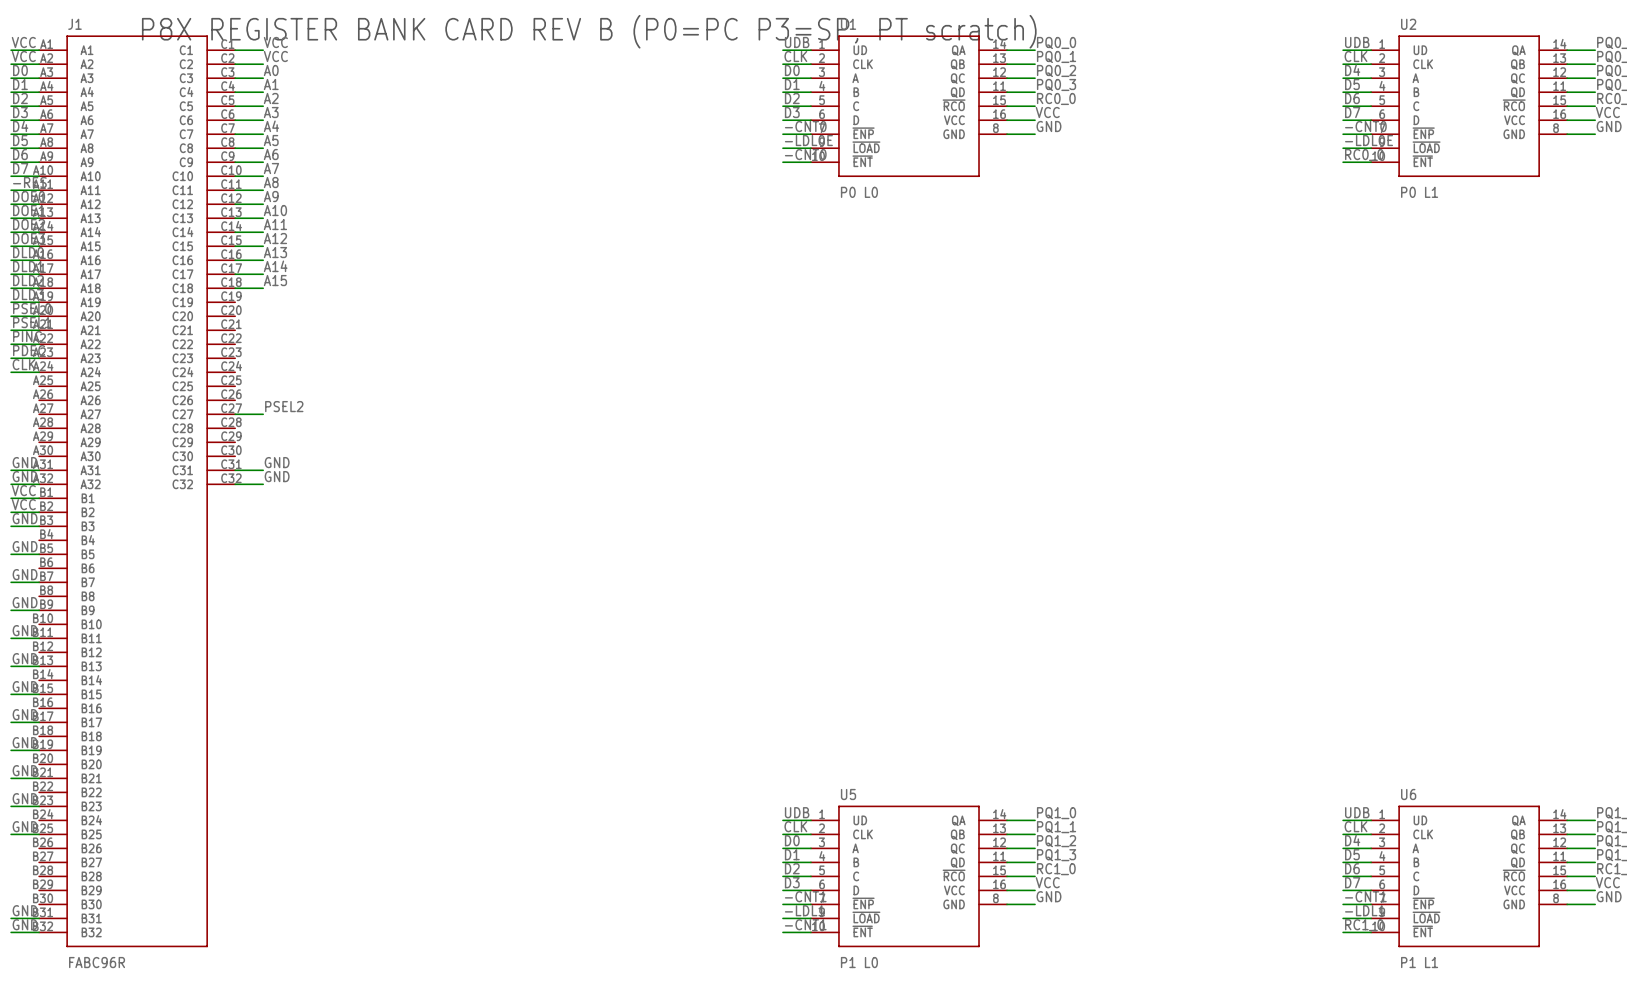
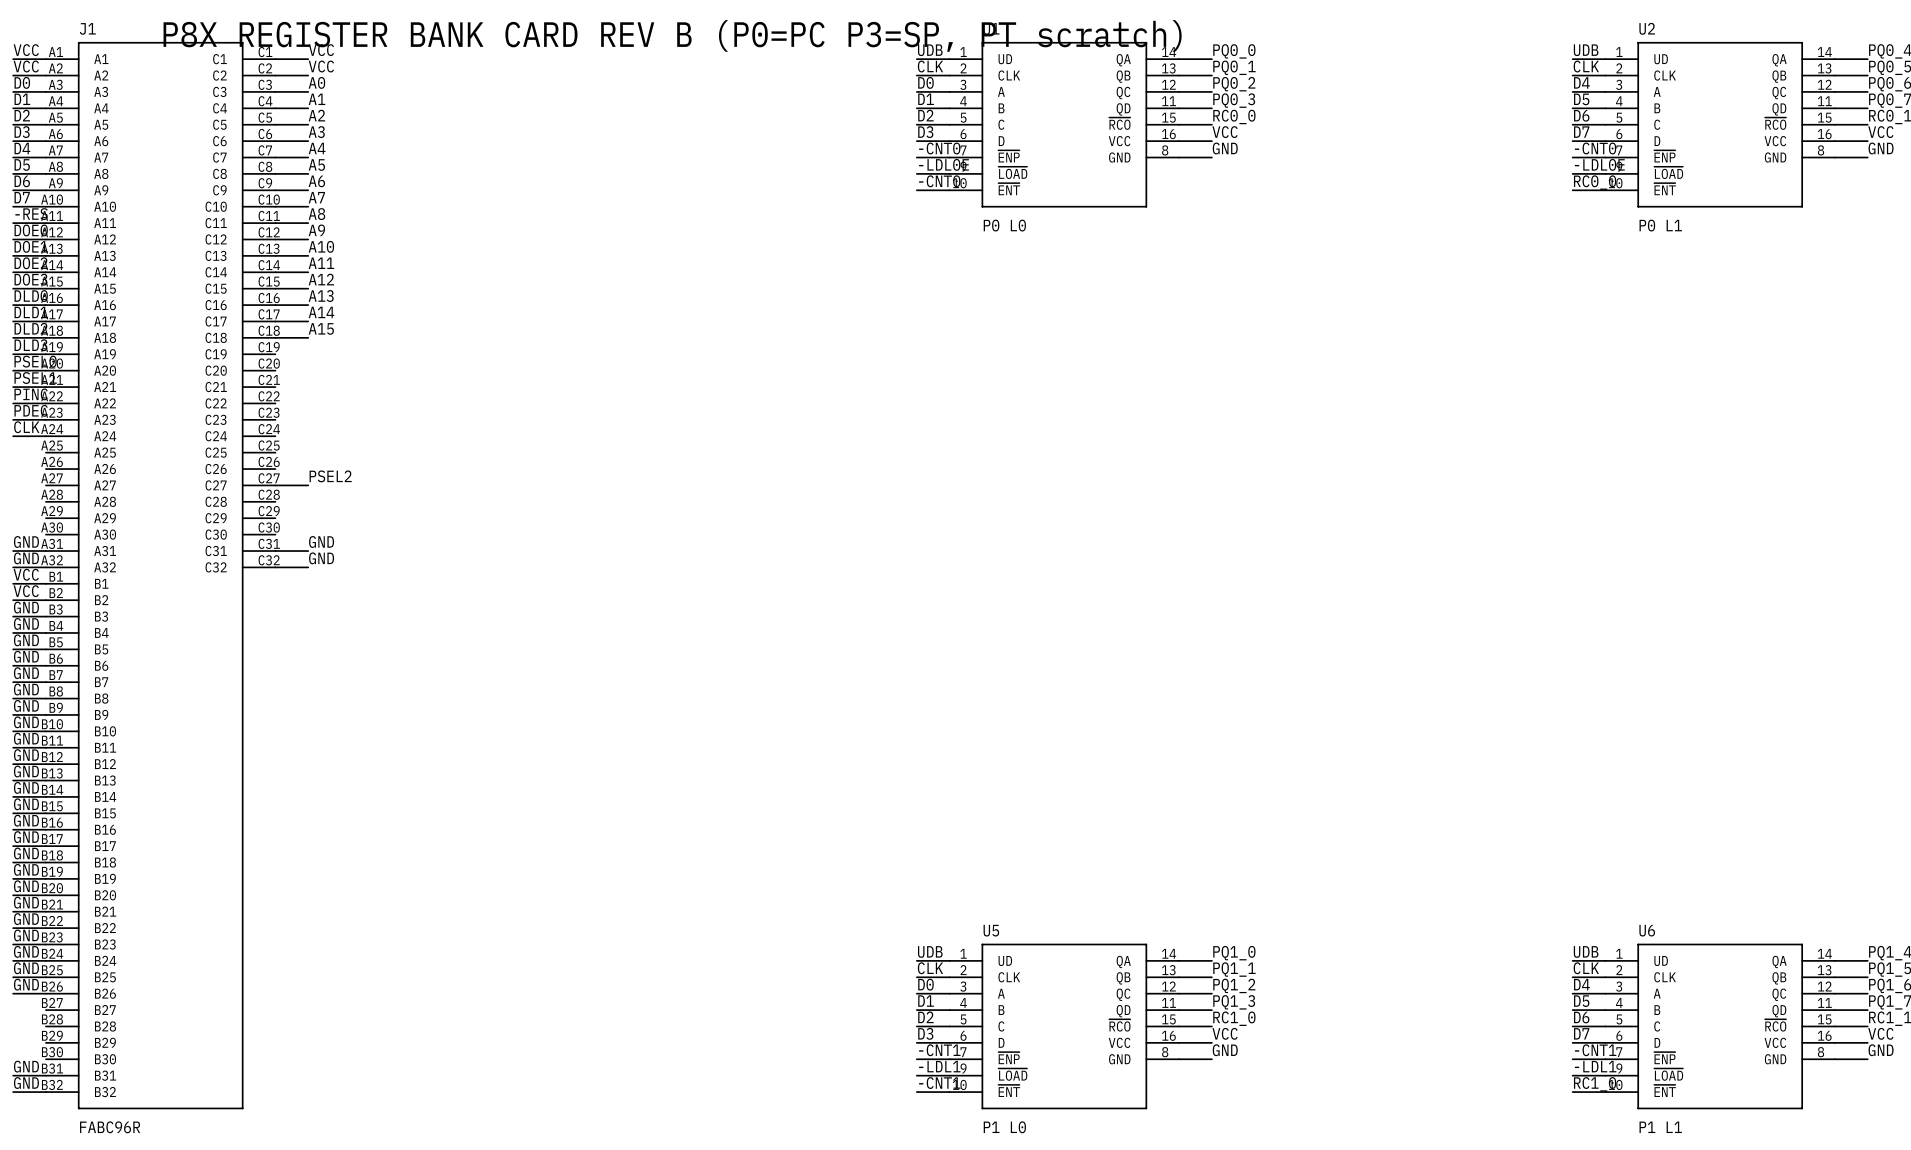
label: none -> GND (26, 623)
wire: none -> (13, 632) (45, 632)
label: none -> GND (26, 656)
wire: none -> (13, 665) (45, 665)
label: none -> GND (26, 689)
wire: none -> (13, 698) (45, 698)
label: none -> GND (26, 722)
wire: none -> (13, 731) (45, 731)
label: none -> GND (26, 755)
wire: none -> (13, 764) (45, 764)
label: none -> GND (26, 787)
wire: none -> (13, 796) (45, 796)
label: none -> GND (26, 820)
wire: none -> (13, 829) (45, 829)
label: none -> GND (26, 853)
wire: none -> (13, 862) (45, 862)
label: none -> GND (26, 886)
wire: none -> (13, 895) (45, 895)
label: none -> GND (26, 919)
wire: none -> (13, 928) (45, 928)
label: none -> GND (26, 951)
wire: none -> (13, 960) (45, 960)
label: none -> GND (26, 984)
wire: none -> (13, 993) (45, 993)

